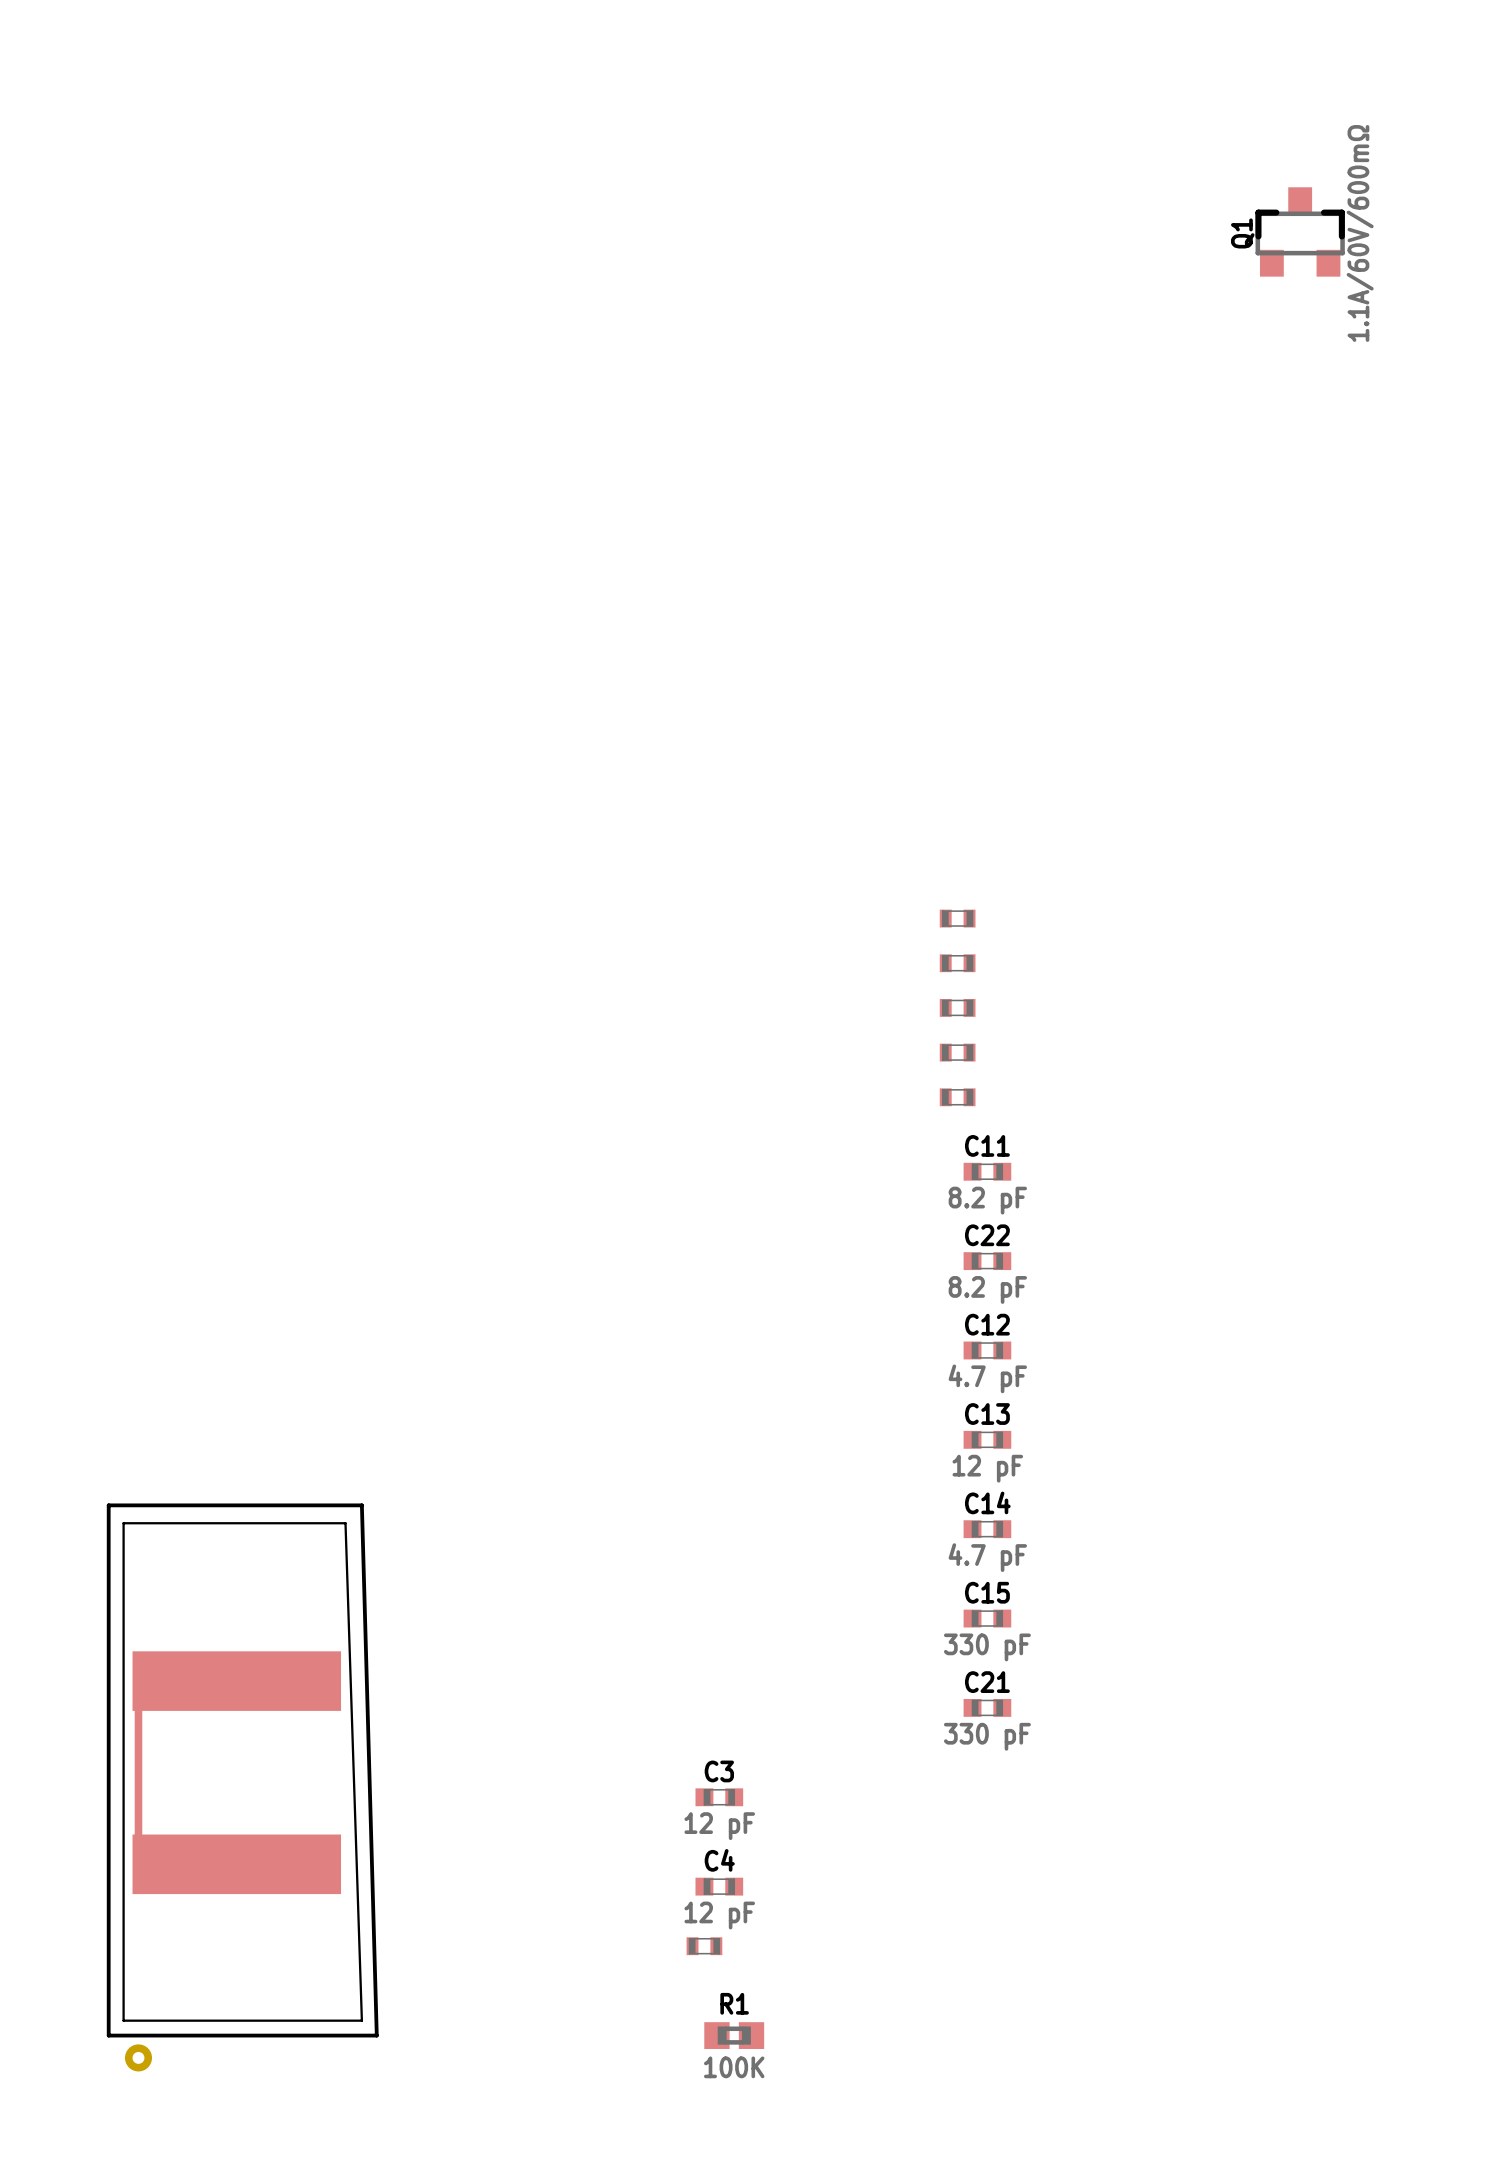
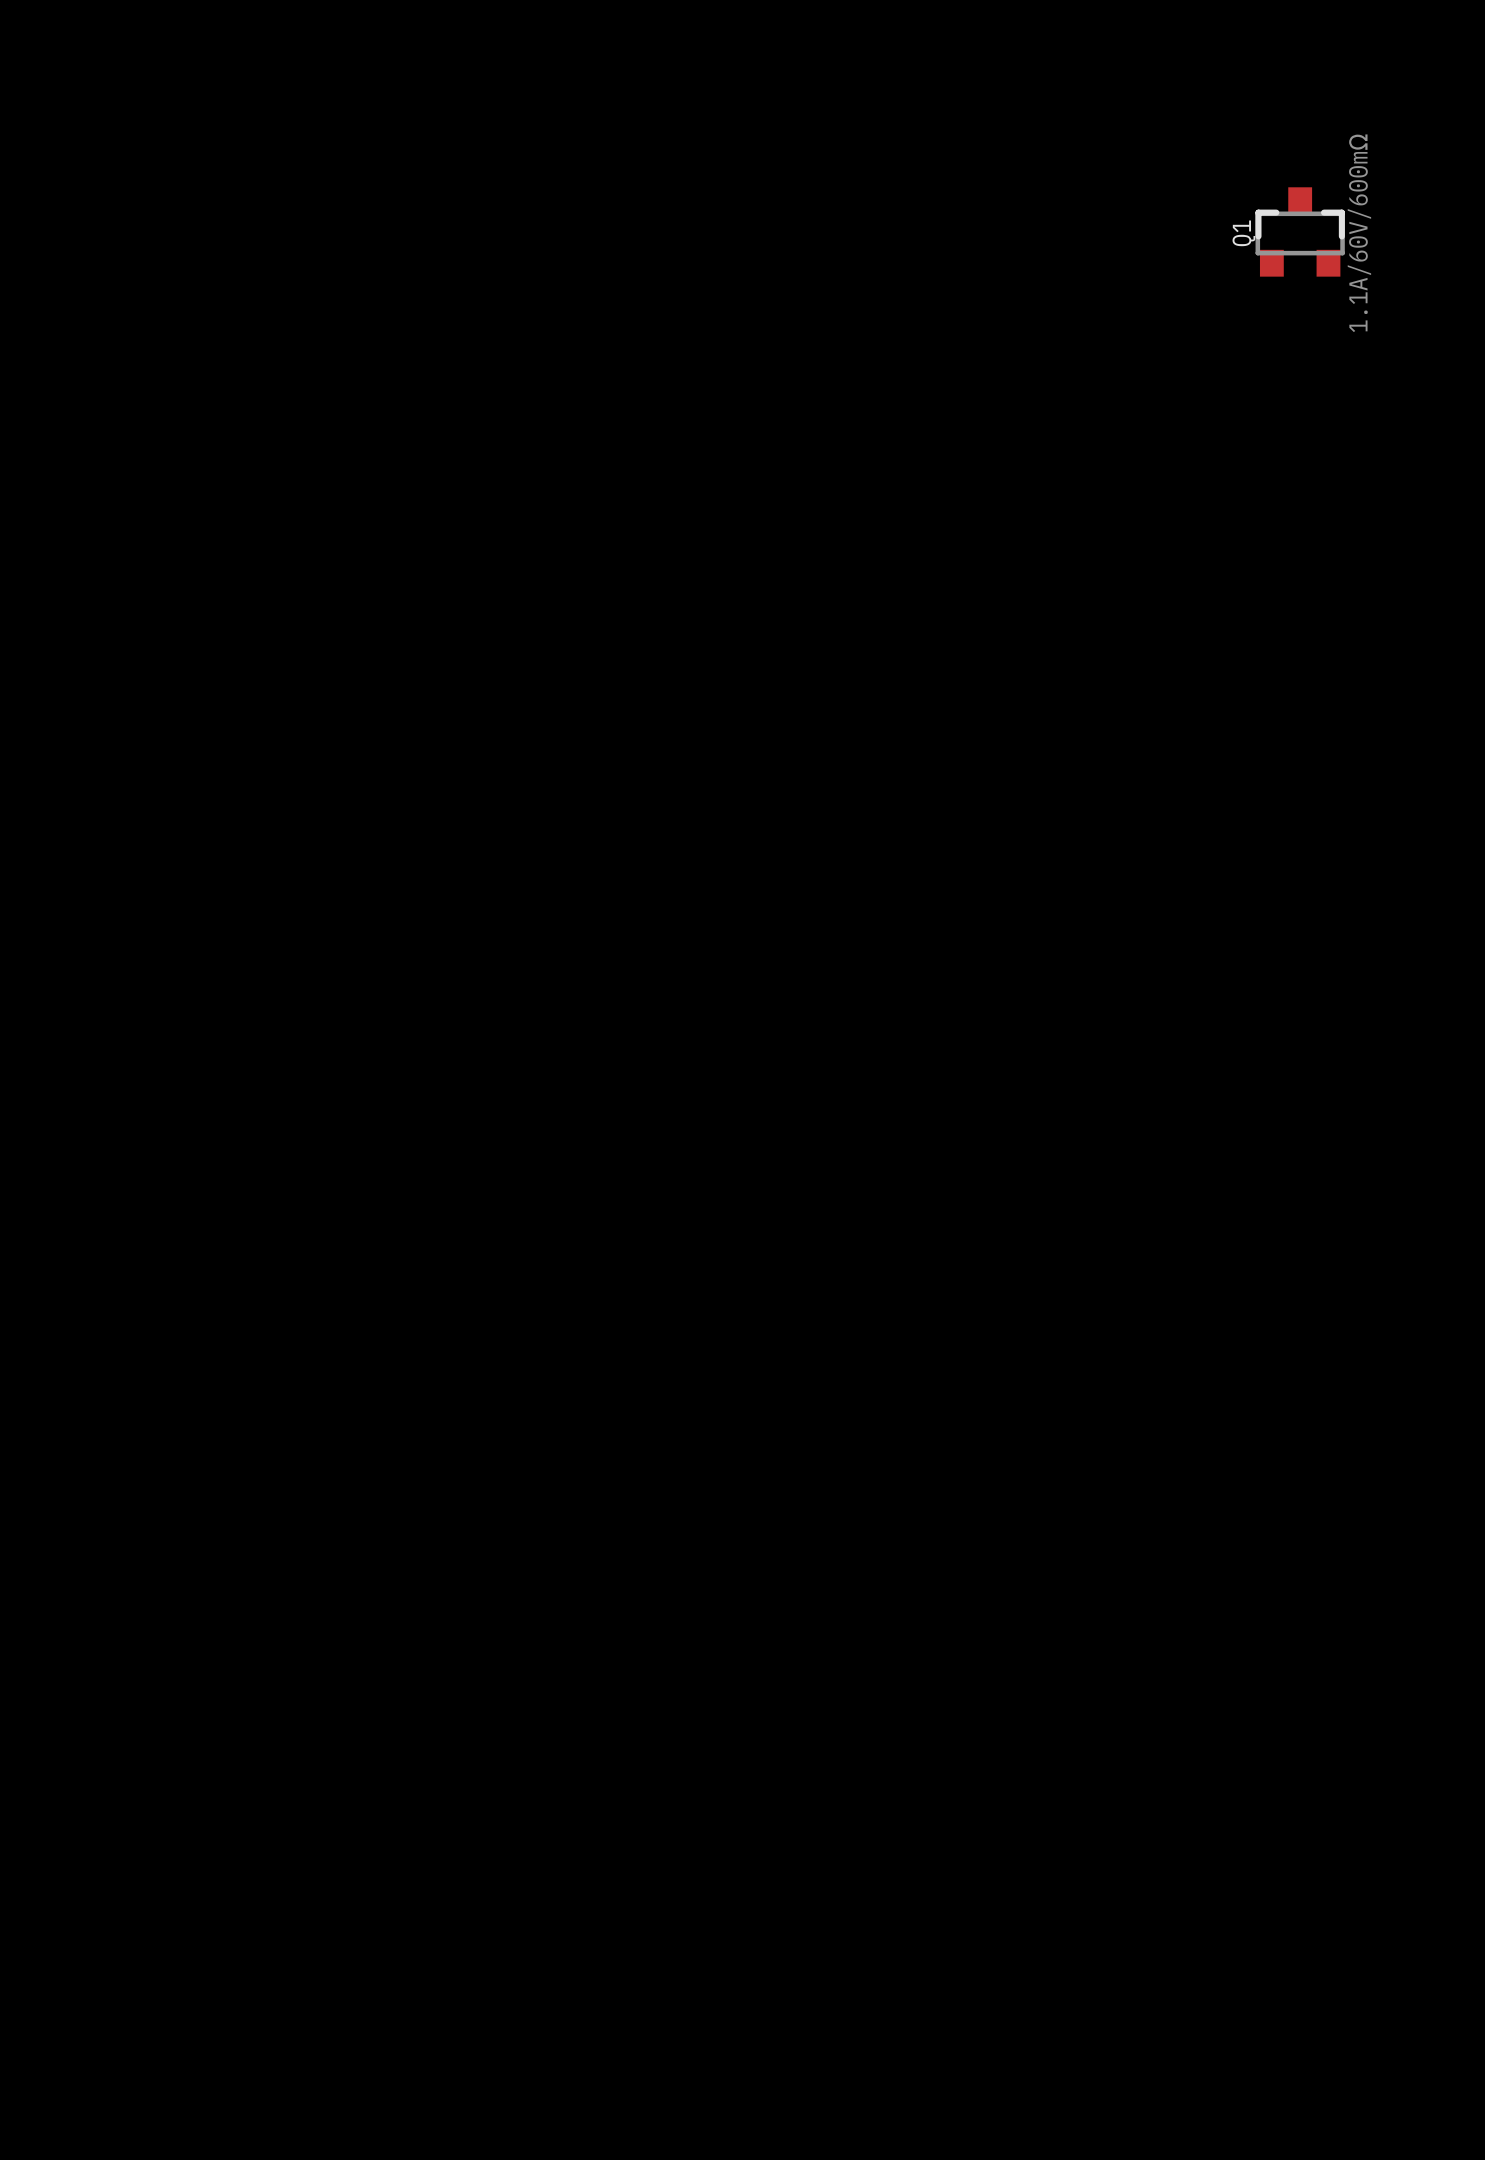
part: (957, 918) -> none
part: (957, 963) -> none
part: (957, 1007) -> none
part: (957, 1052) -> none
part: (957, 1097) -> none
C11: 8.2 pF (987, 1171) -> none
C22: 8.2 pF (987, 1261) -> none
C12: 4.7 pF (987, 1350) -> none
C13: 12 pF (987, 1439) -> none
C14: 4.7 pF (987, 1529) -> none
C15: 330 pF (987, 1618) -> none
C21: 330 pF (987, 1707) -> none
part: (242, 1787) -> none
C3: 12 pF (719, 1797) -> none
C4: 12 pF (719, 1886) -> none
part: (704, 1946) -> none
R1: 100K (734, 2035) -> none

